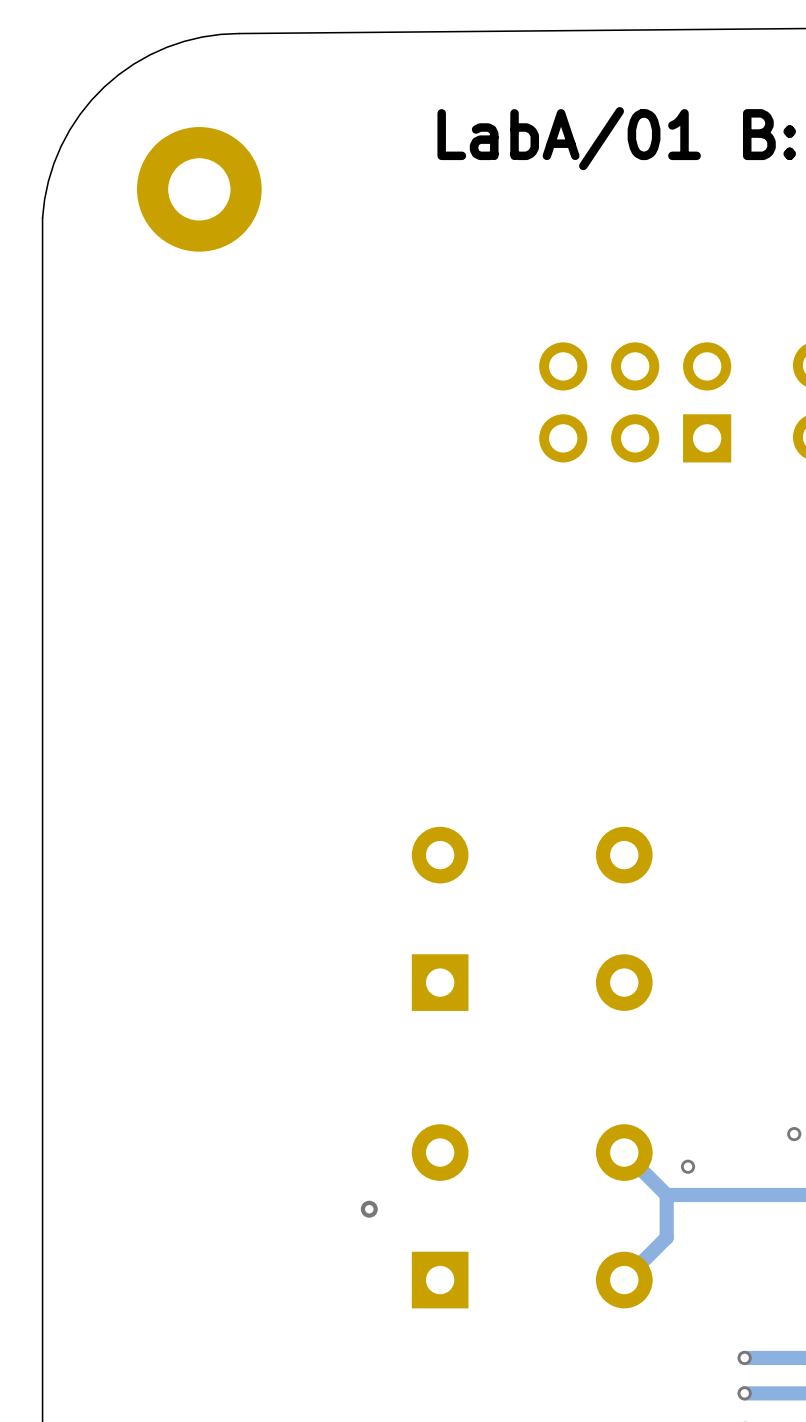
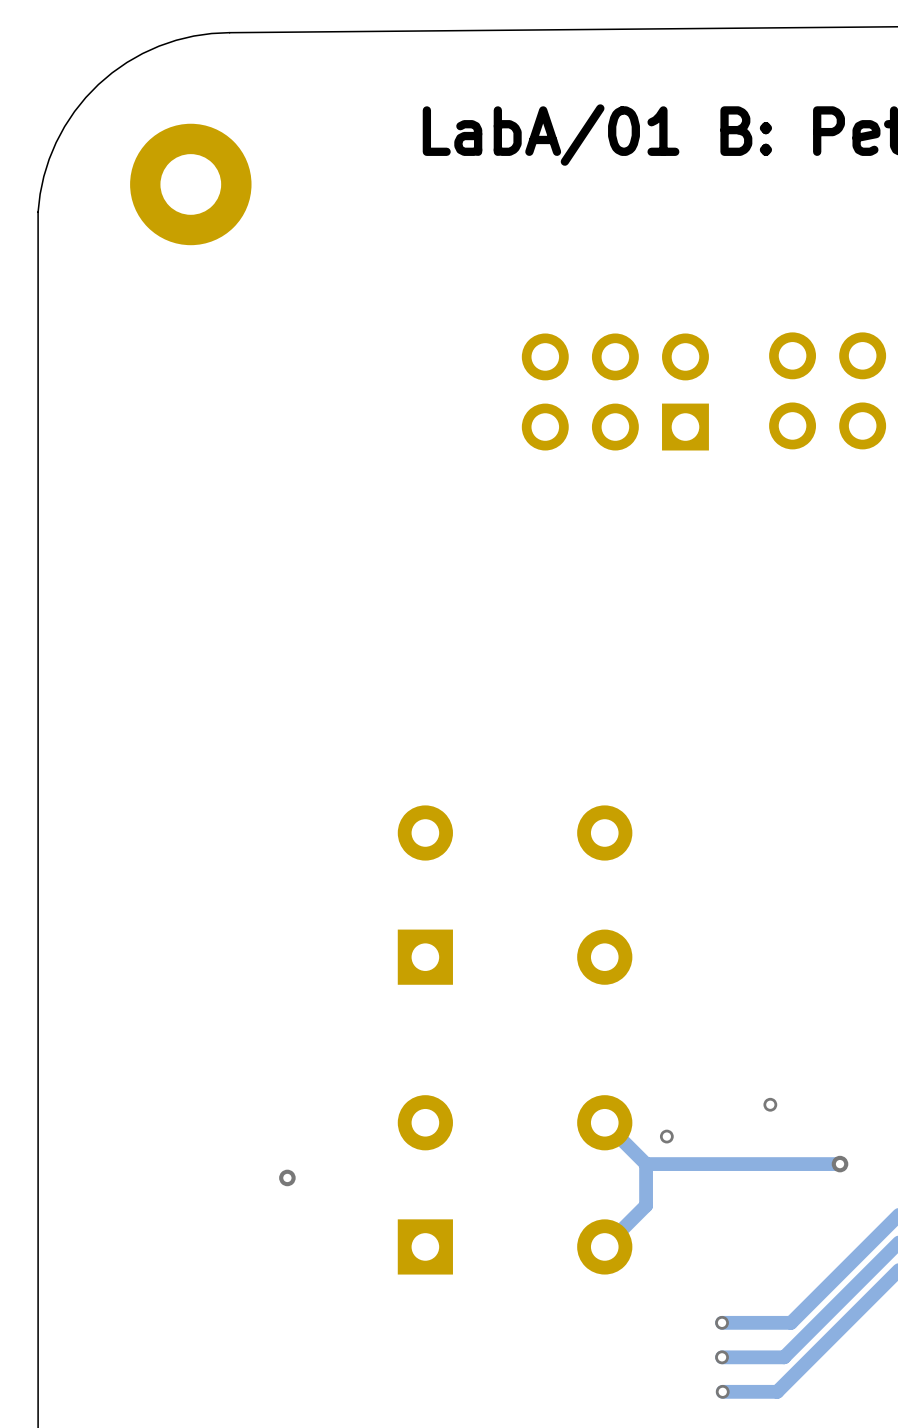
via position: (369, 1209) -> (287, 1177)

